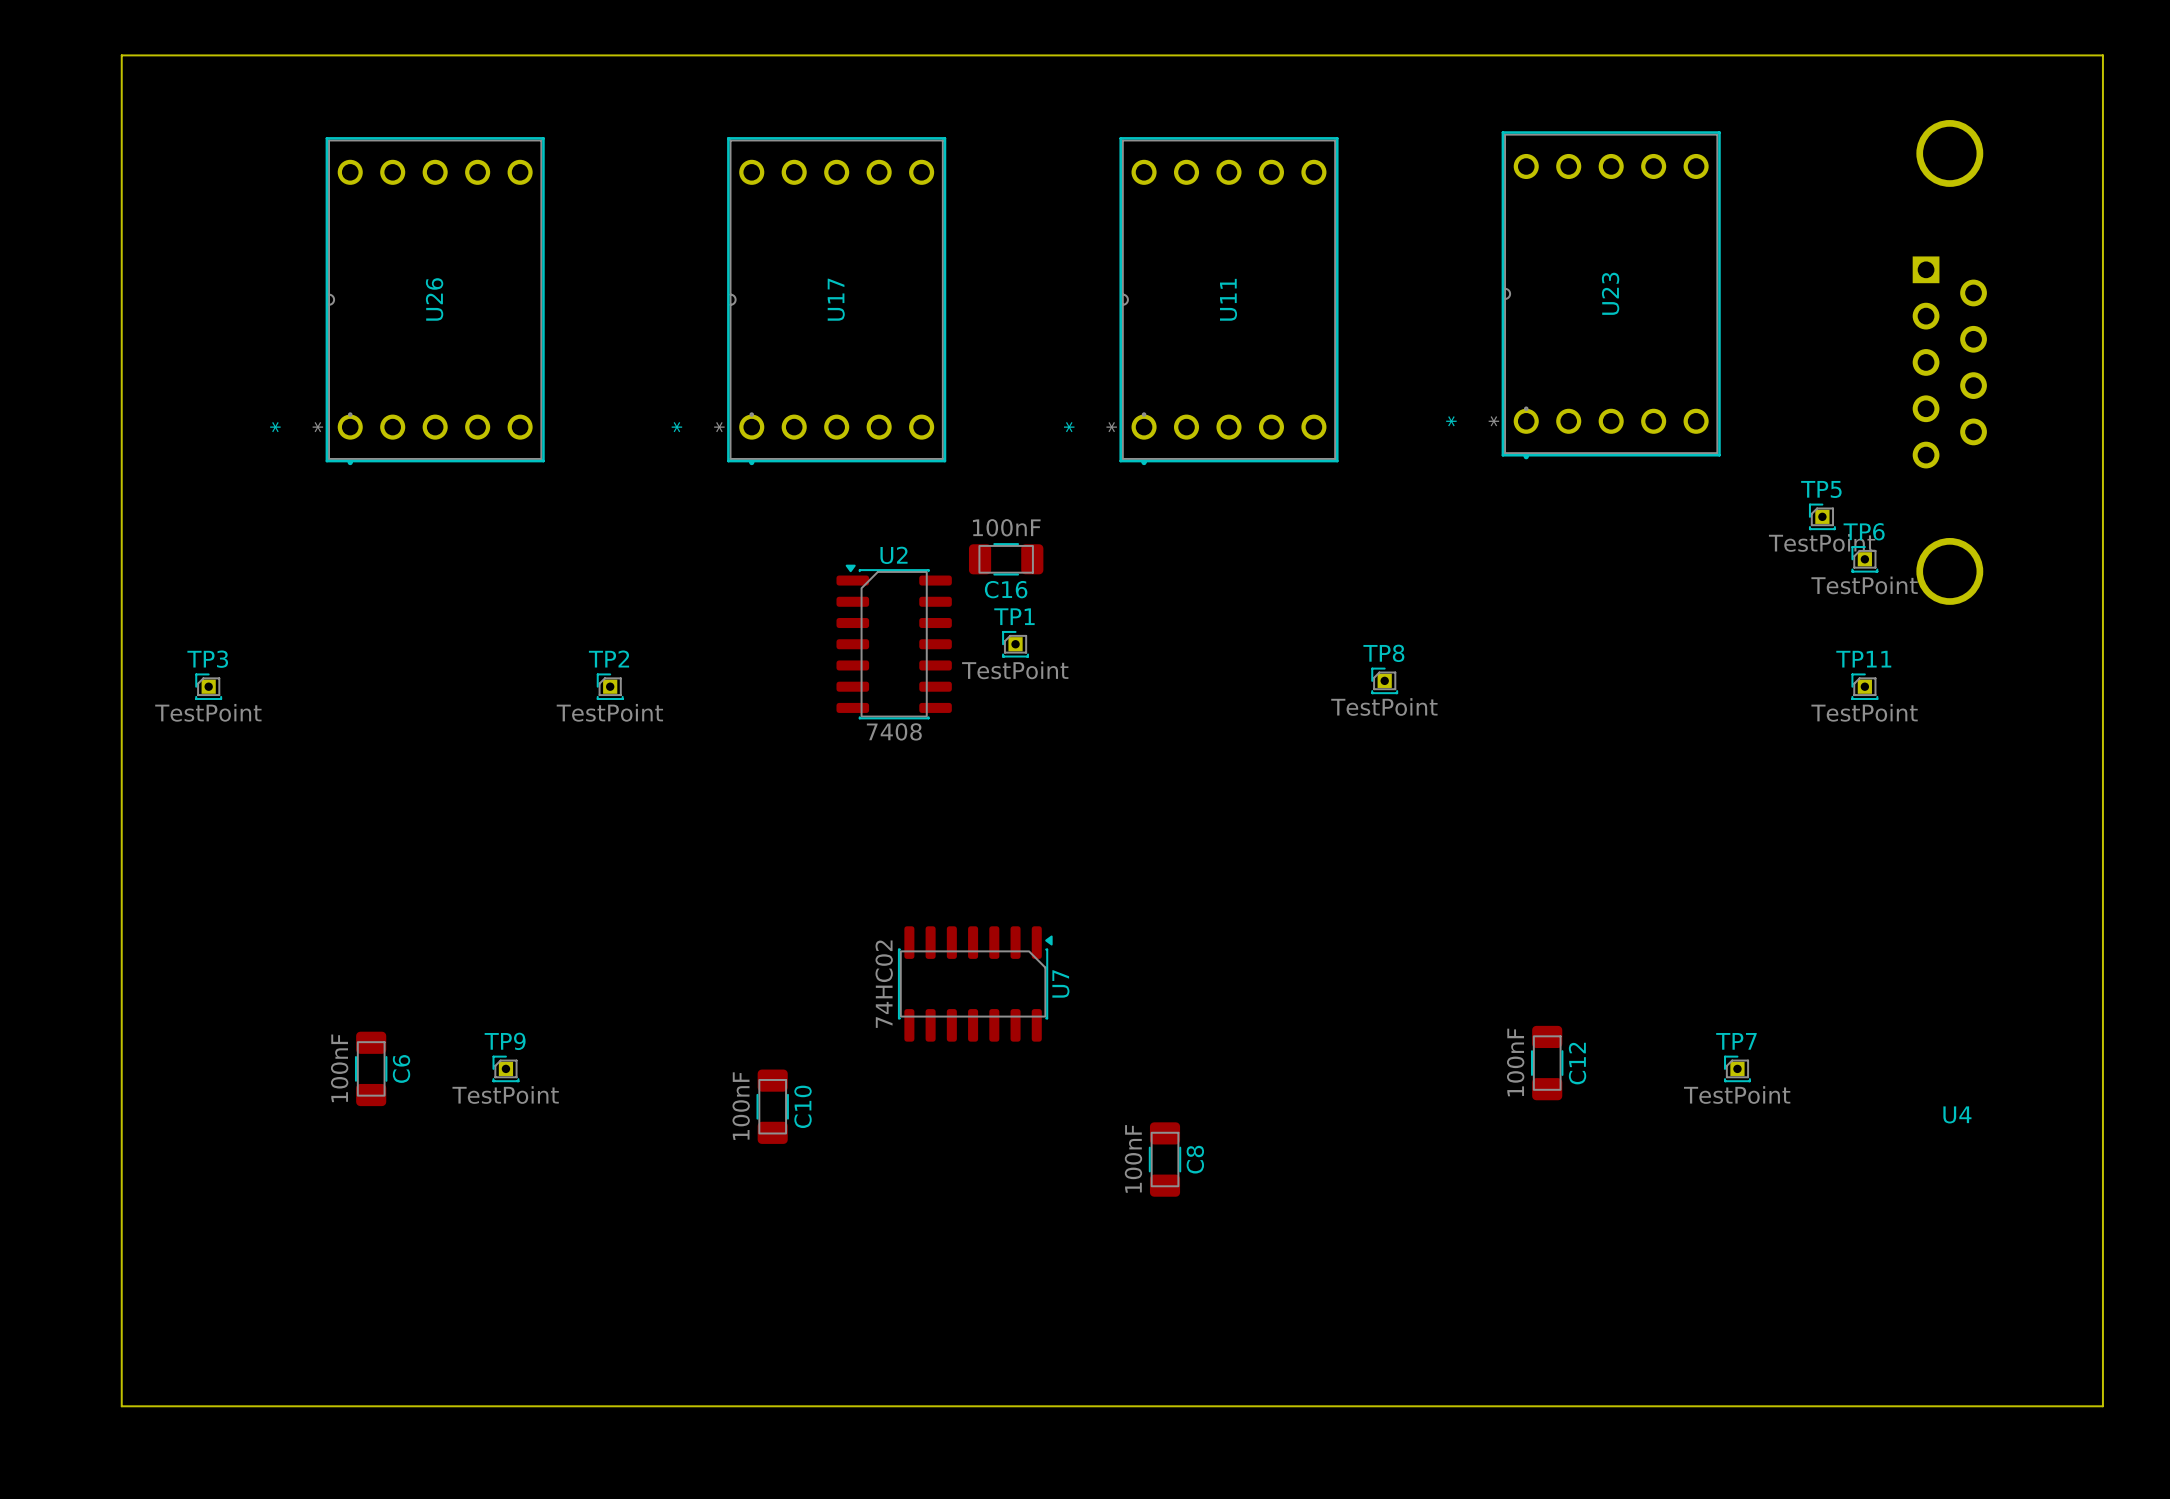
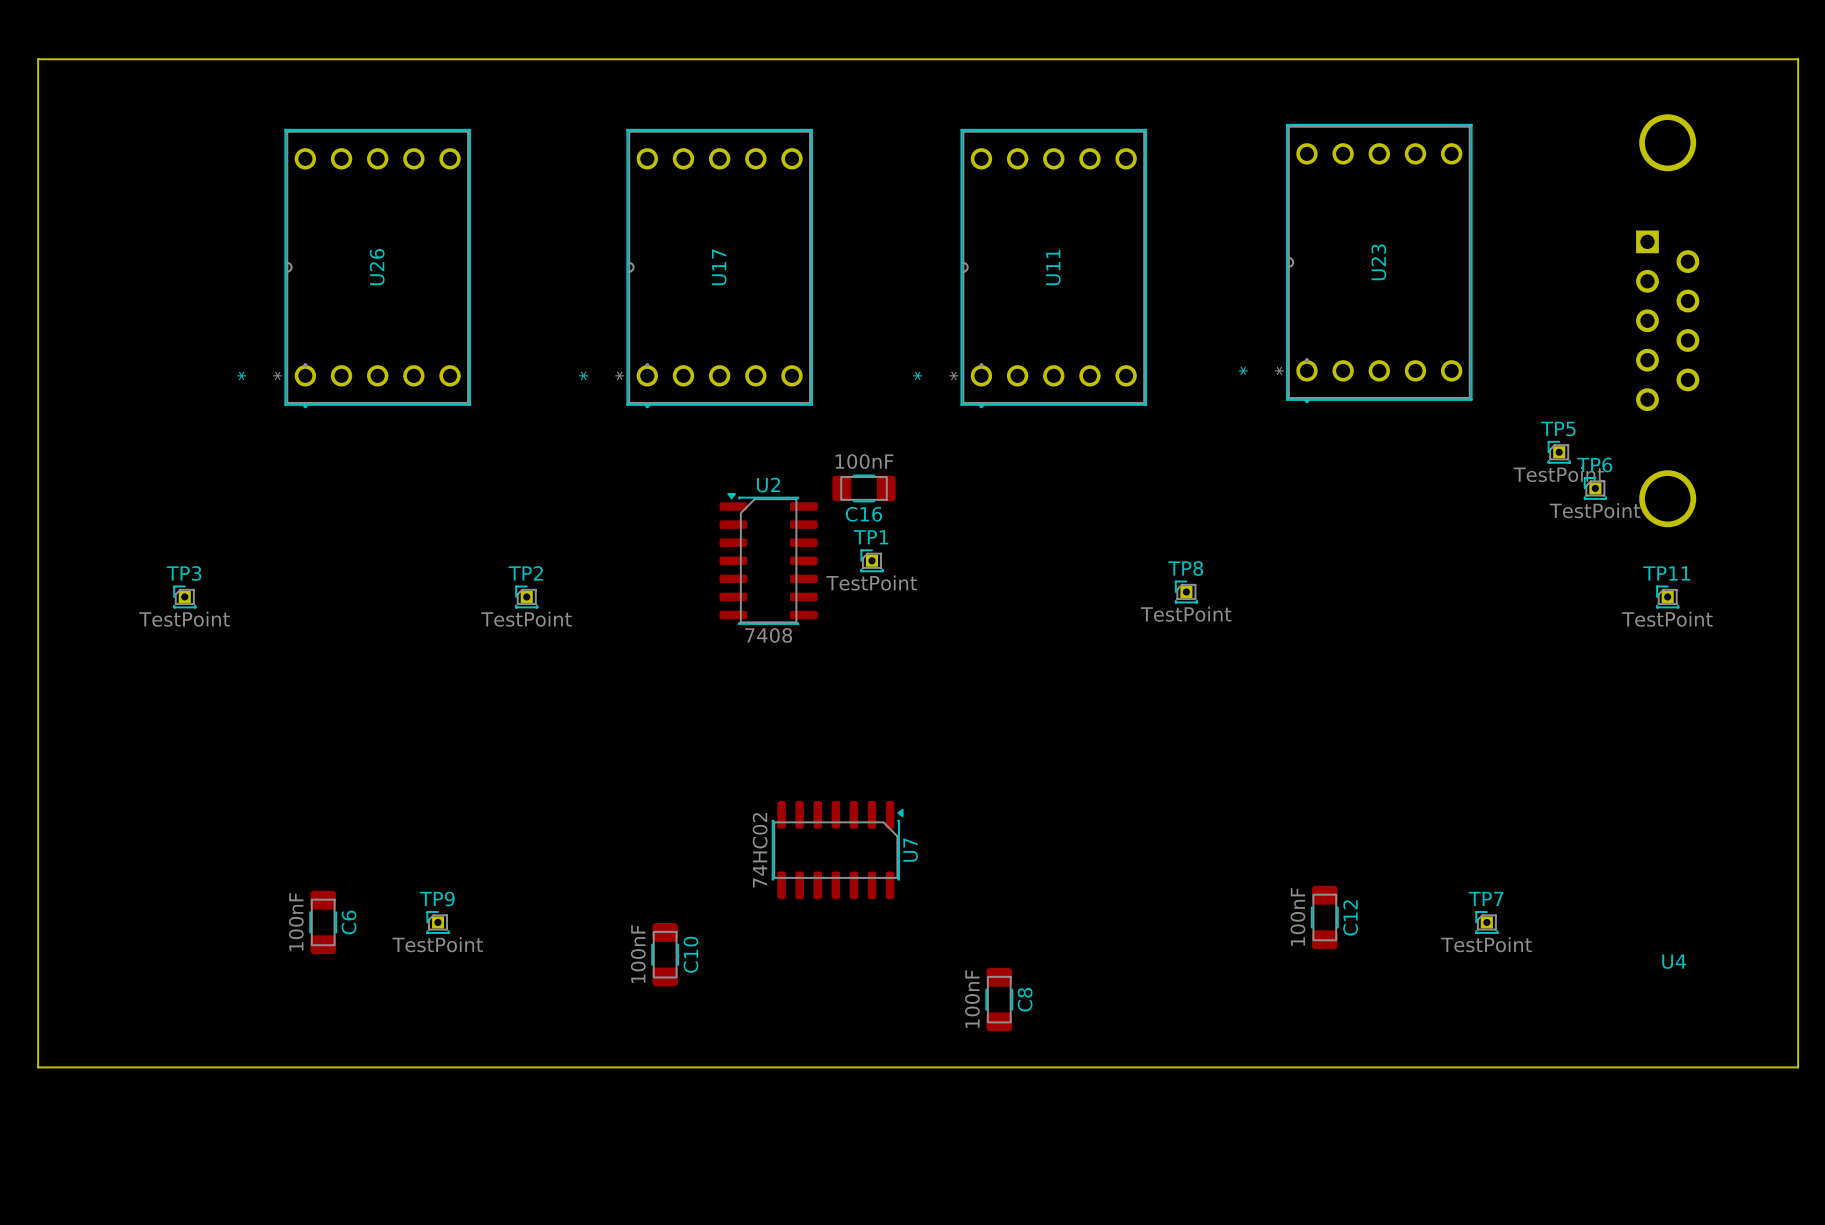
board edge: (121, 55) (121, 1406) (2102, 1406) (2102, 1239) -> (110, 59) (38, 59) (38, 1067) (1798, 1067)
TP11 position: (1864, 686) -> (1667, 596)

